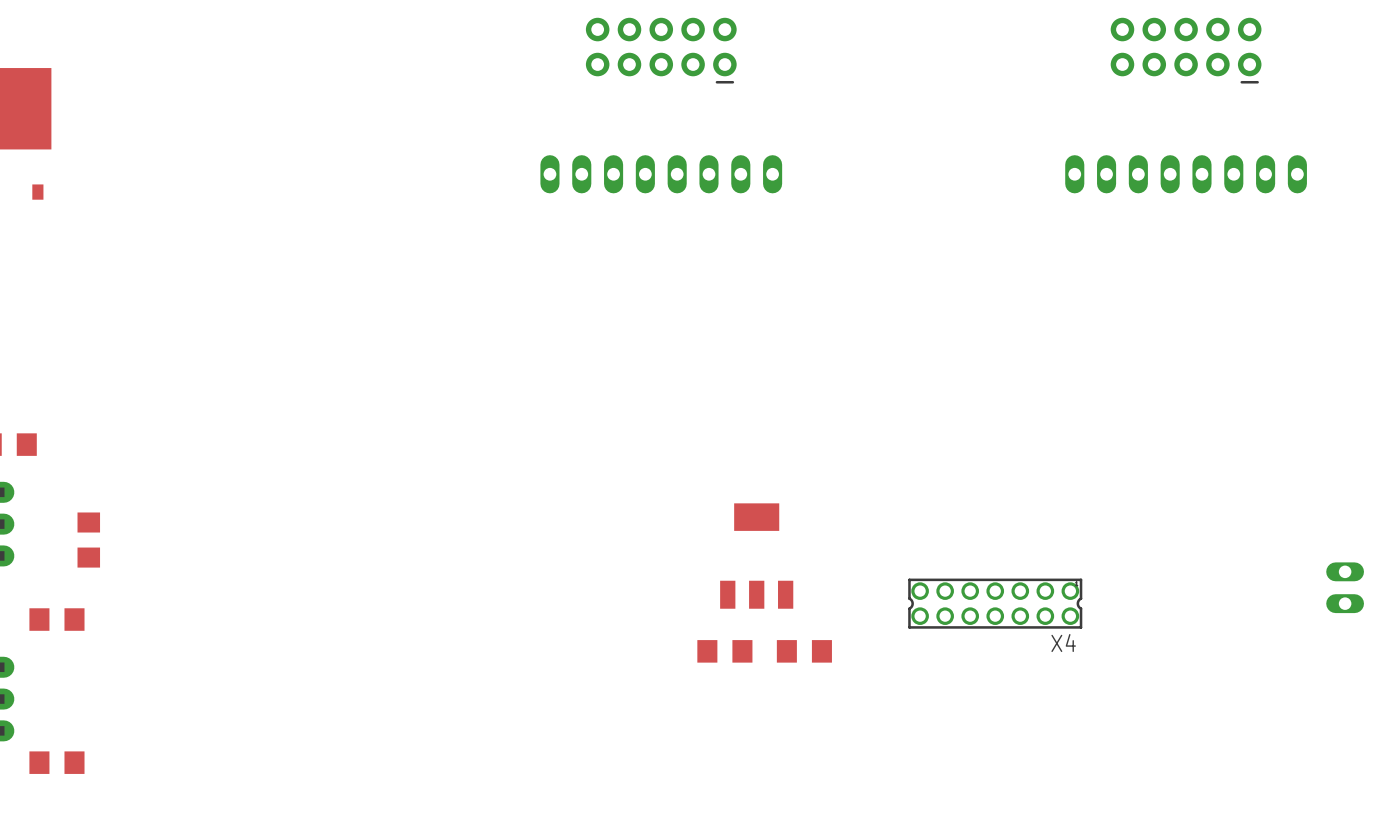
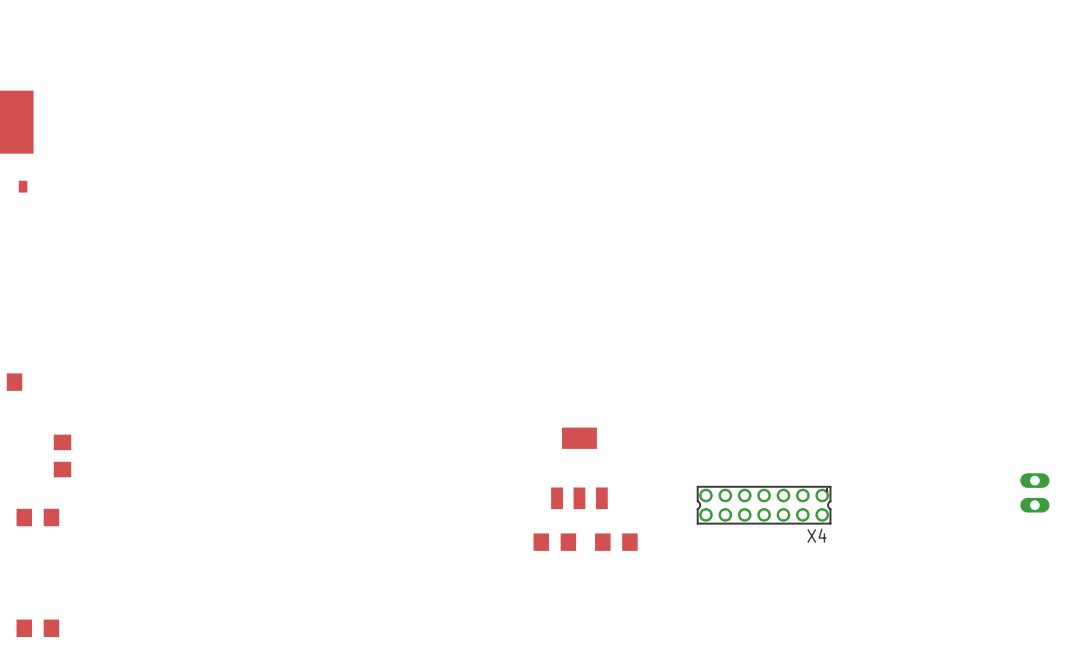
part: (661, 50) -> none
part: (1186, 50) -> none
part: (661, 174) -> none
part: (1186, 174) -> none

